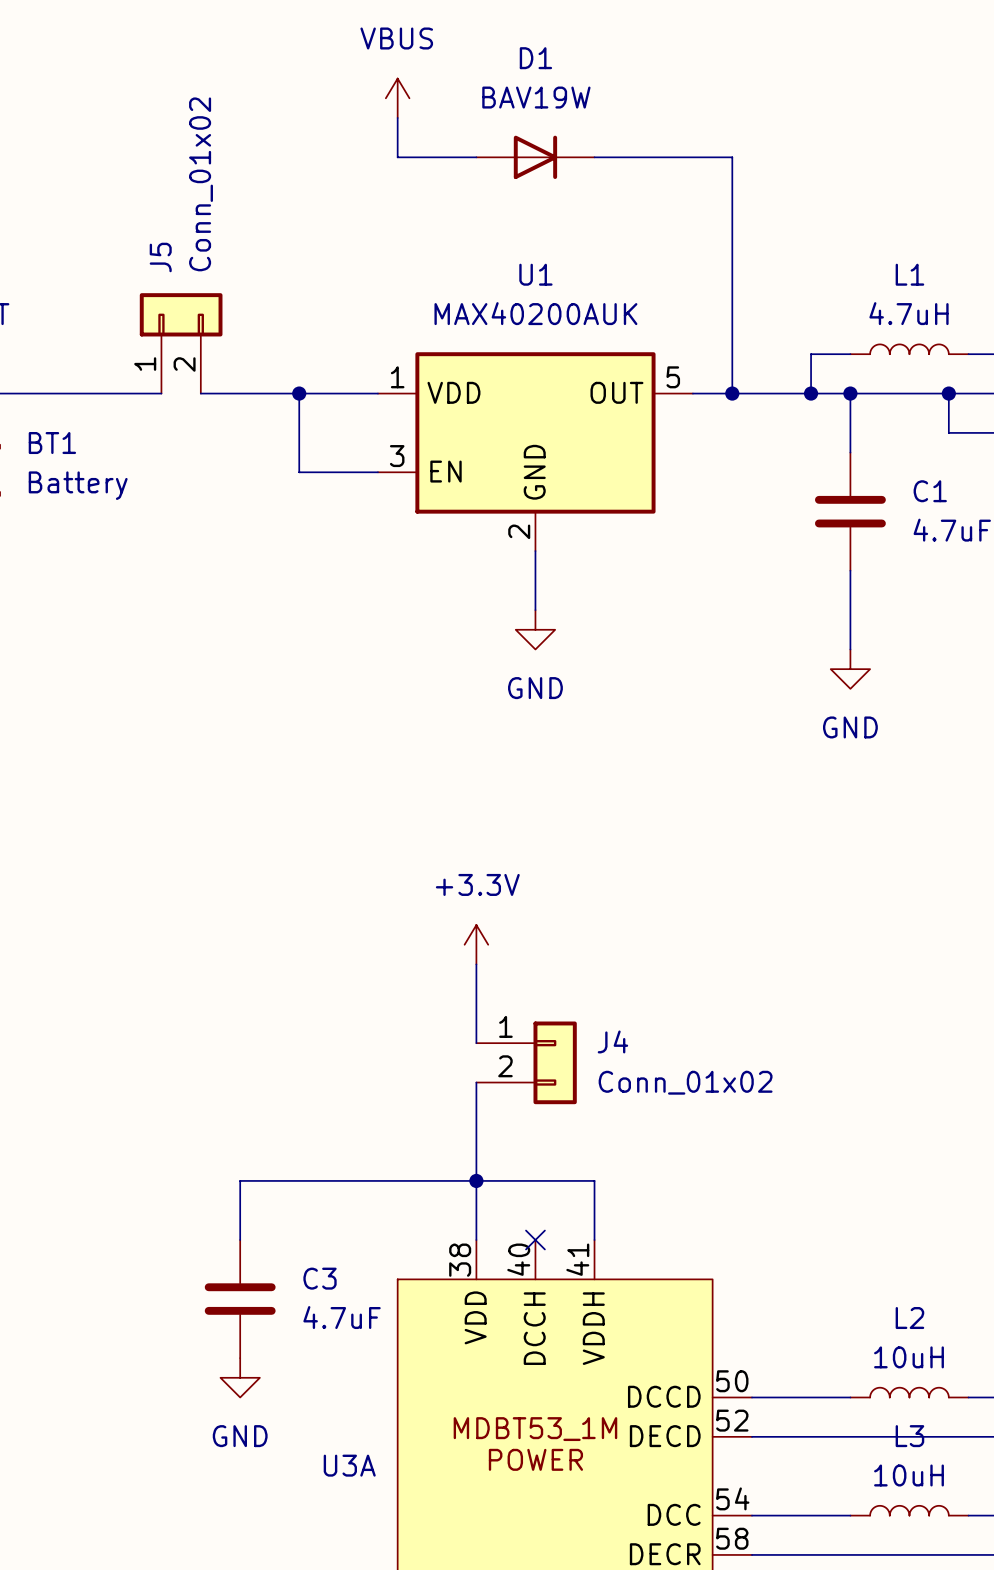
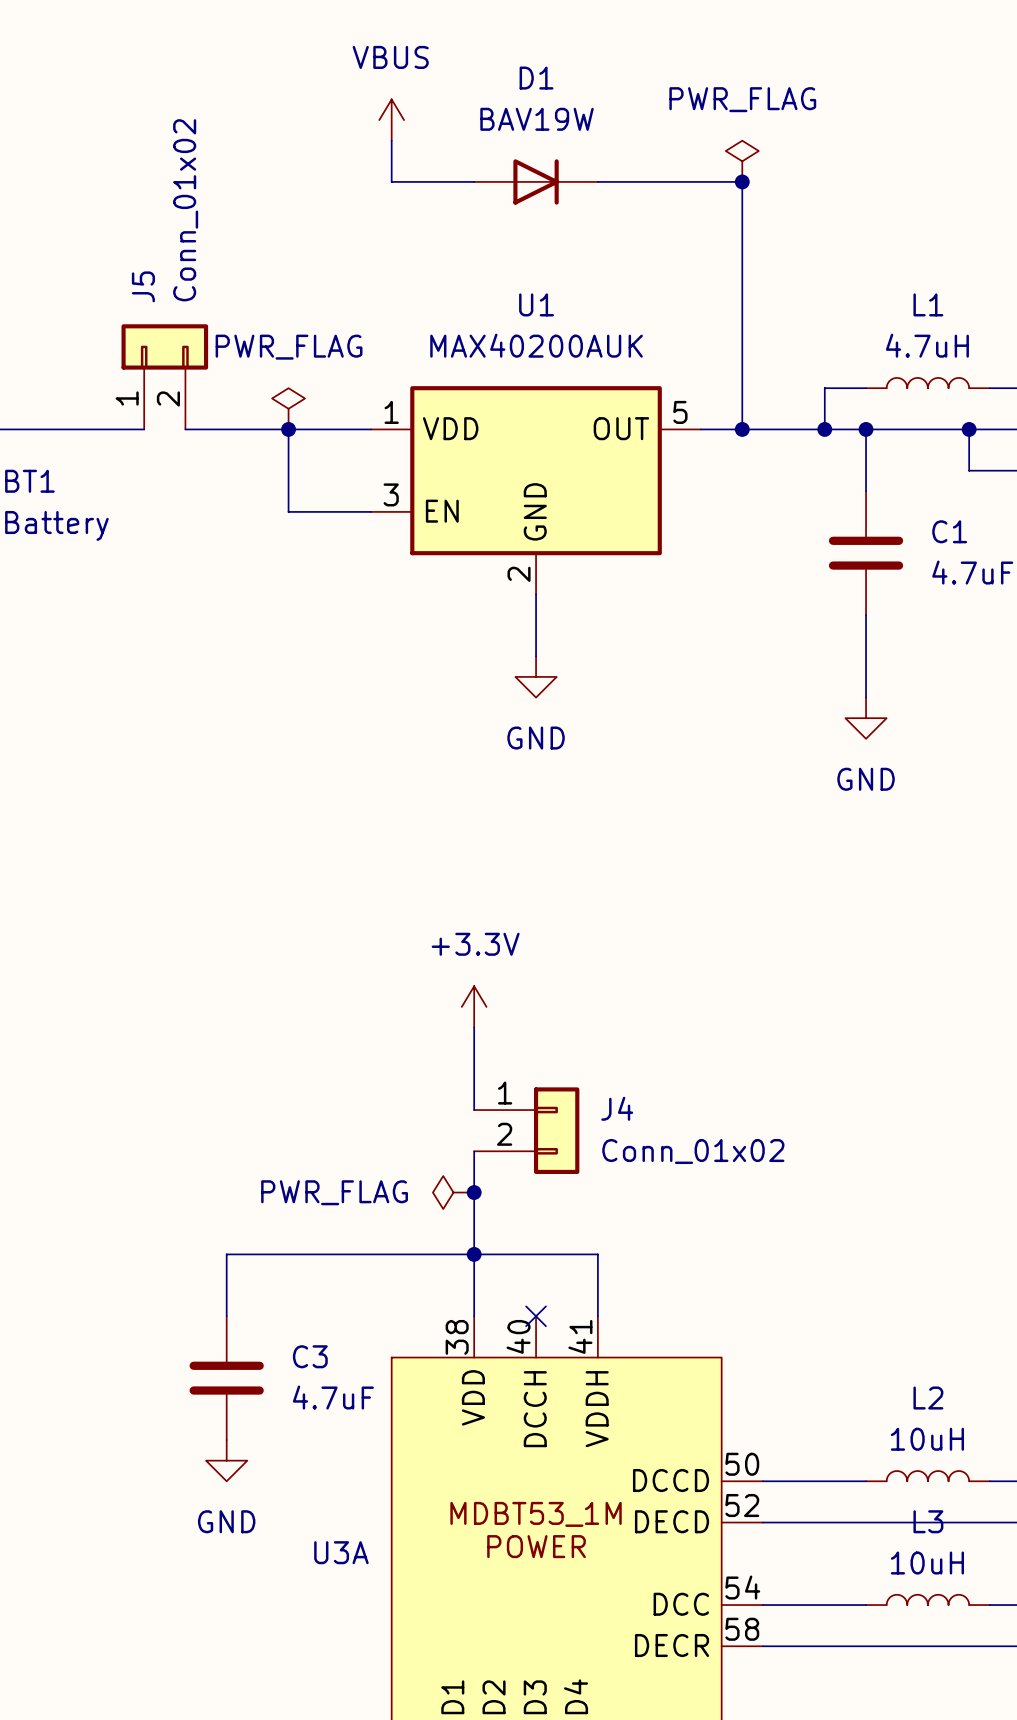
power symbol: none -> PWR_FLAG (742, 161)
junction: none -> (742, 181)
power symbol: none -> PWR_FLAG (288, 408)
power symbol: none -> PWR_FLAG (453, 1192)
junction: none -> (474, 1192)

